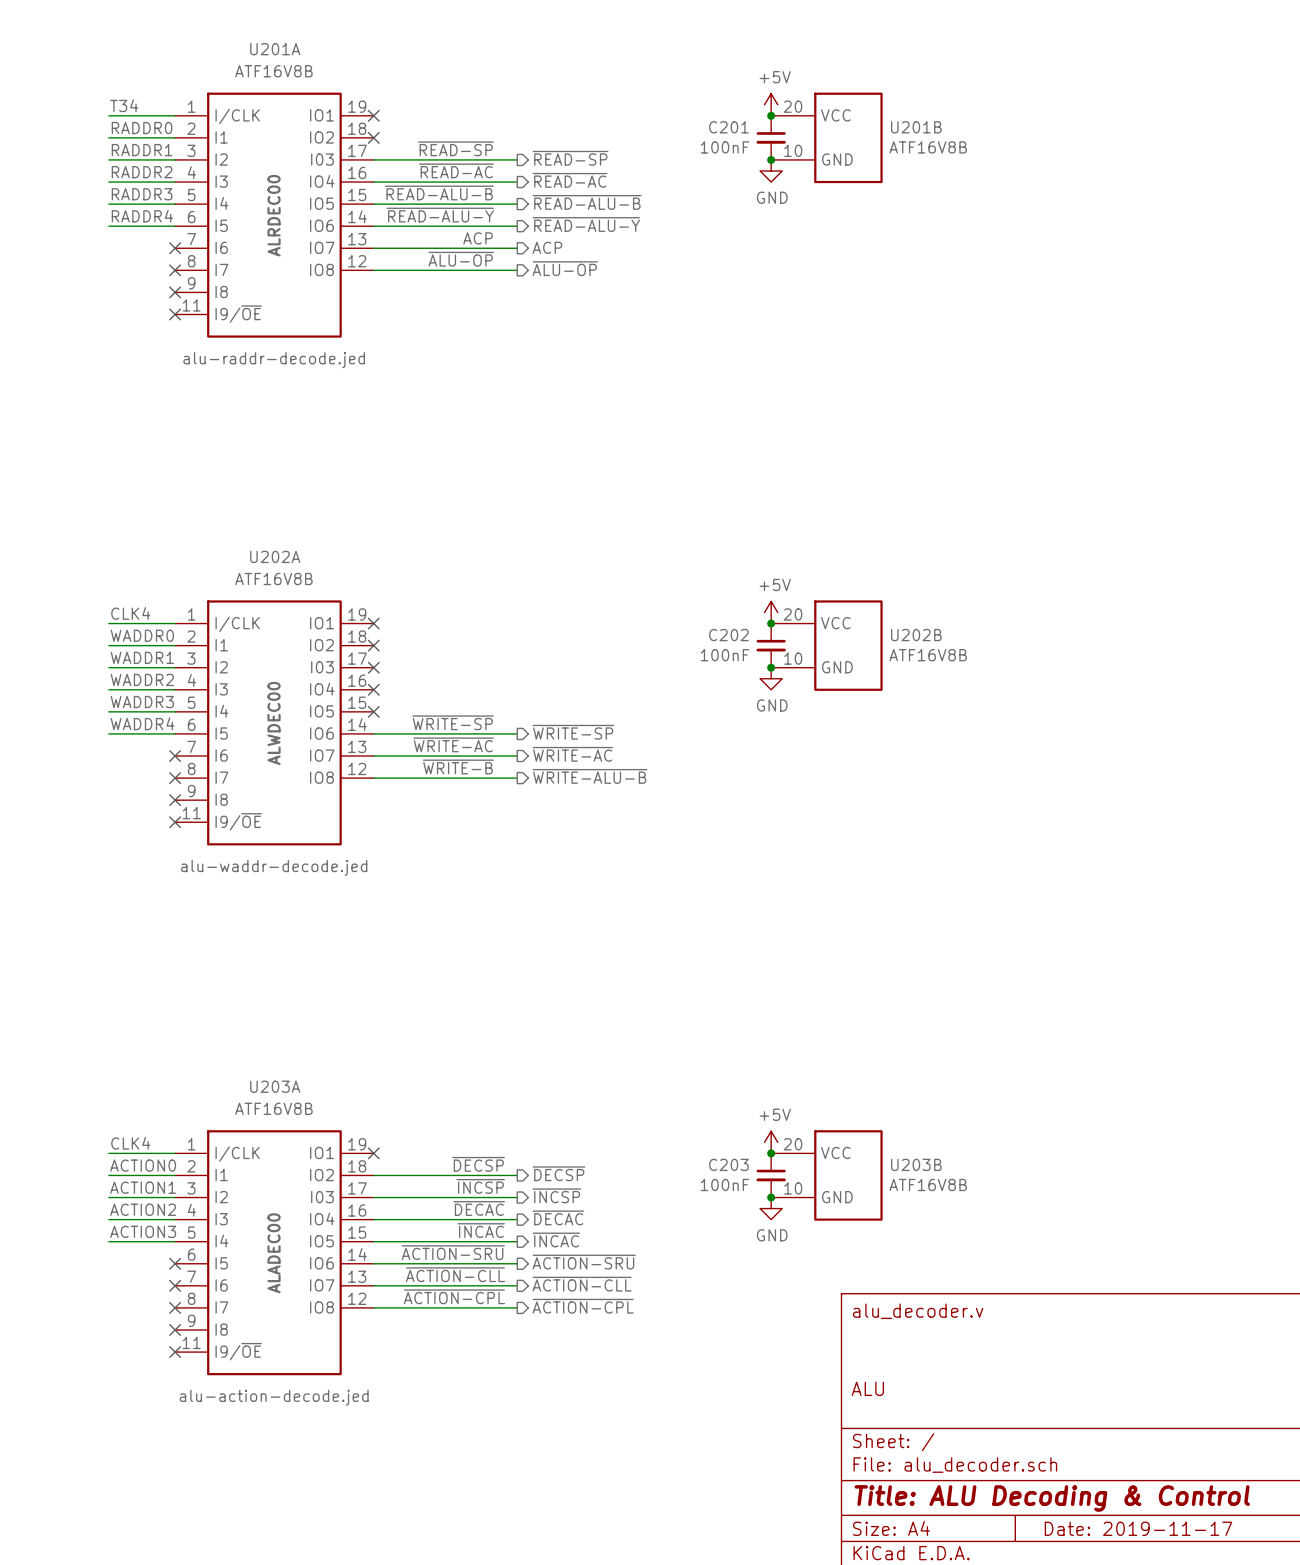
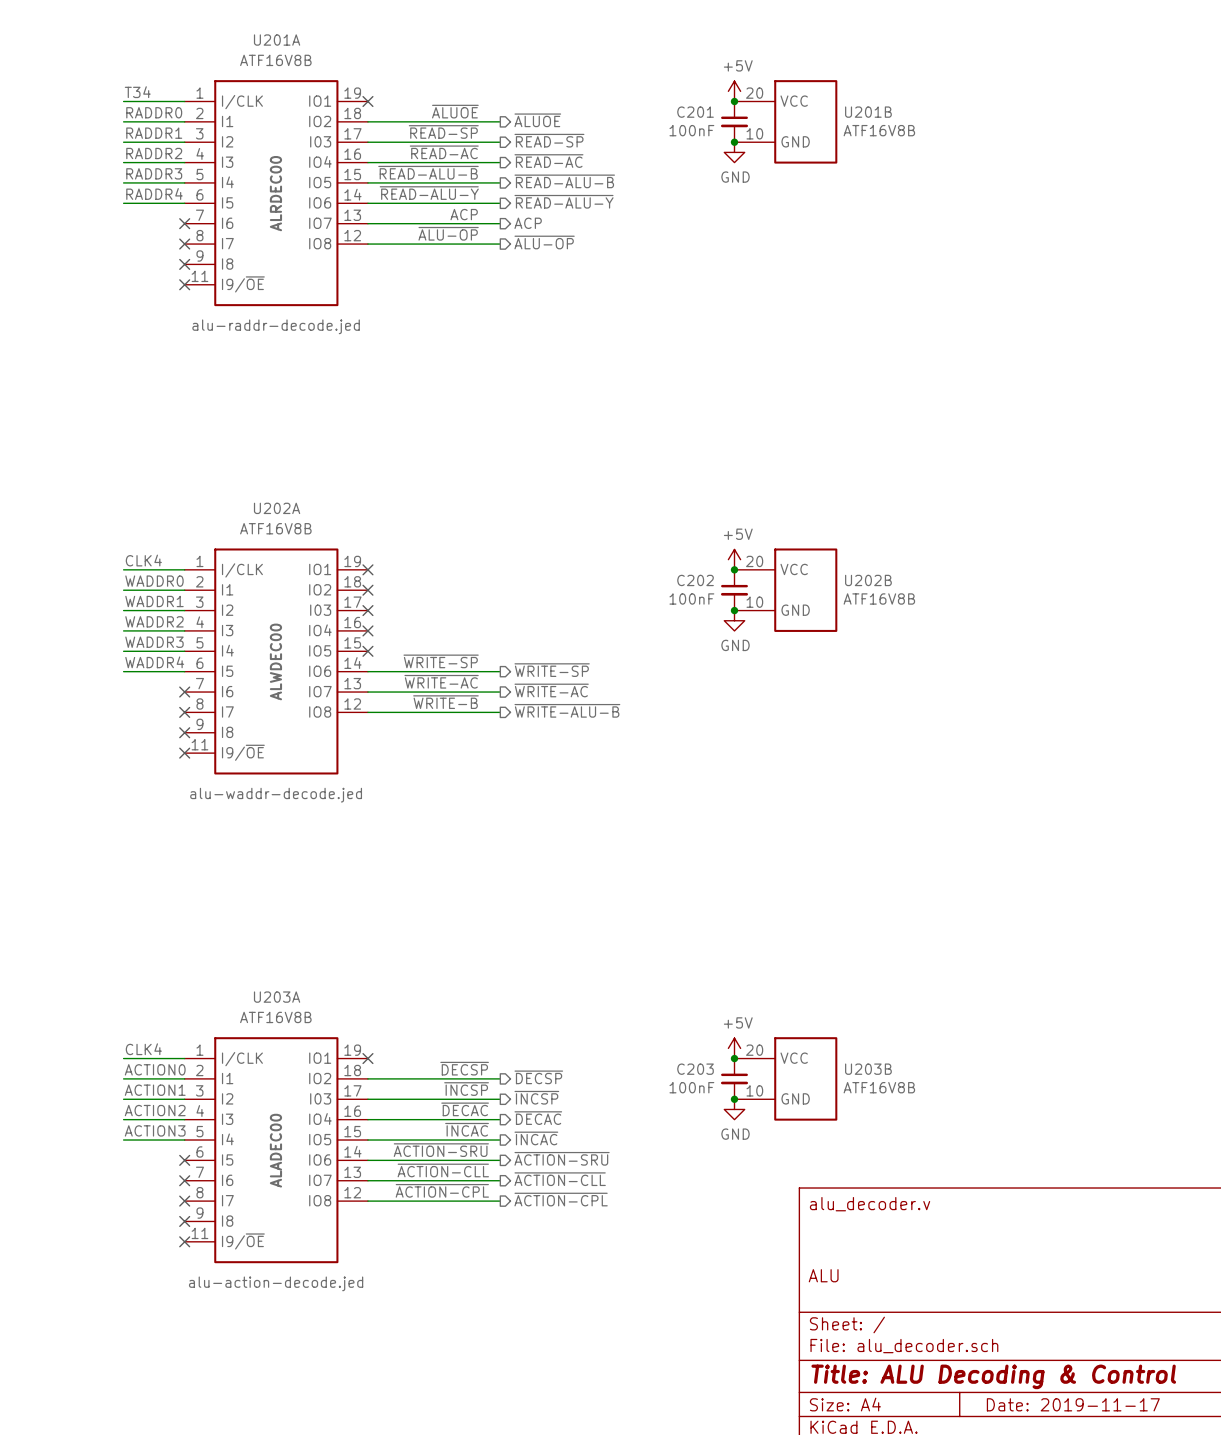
label: none -> ~{ALUOE} (455, 111)
hierarchical label: none -> ~{ALUOE} (537, 120)
wire: none -> (367, 121) (500, 121)
no-connect mark: (373, 137) -> none

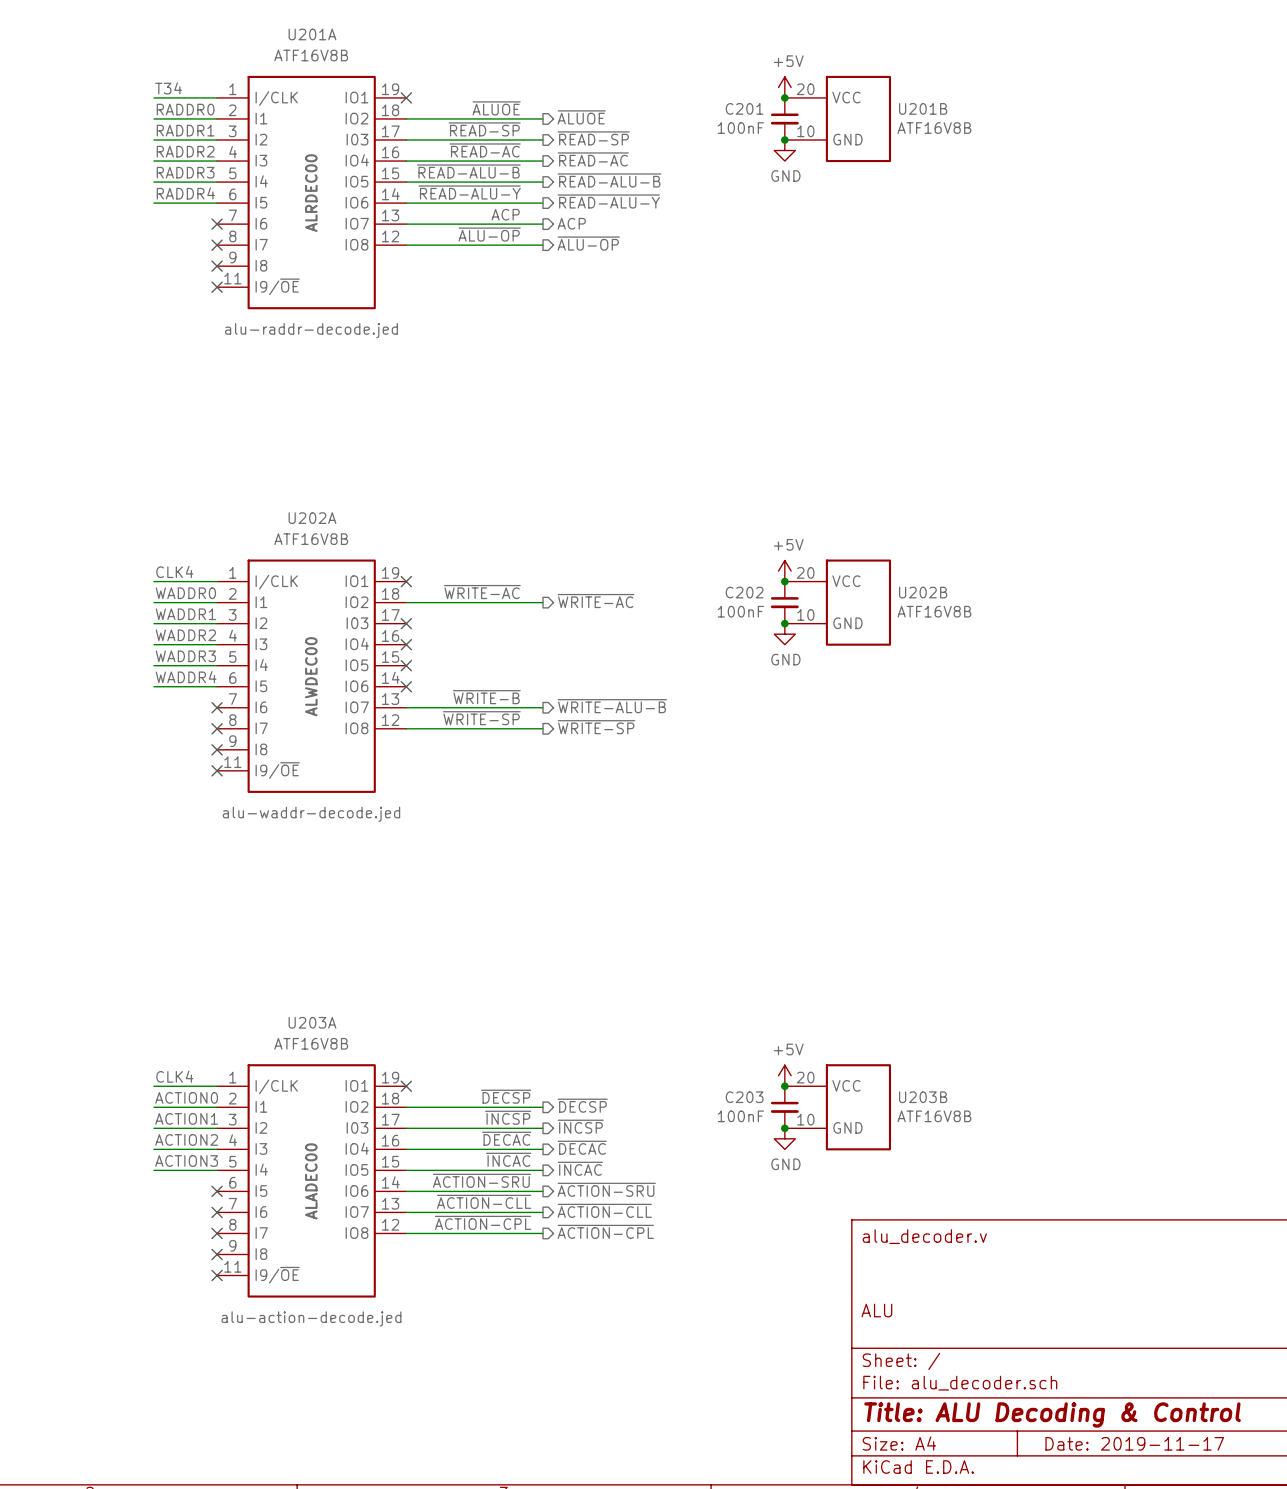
label: none -> ~{WRITE-AC} (482, 592)
hierarchical label: none -> ~{WRITE-AC} (596, 601)
no-connect mark: (367, 590) -> none
label: ~{WRITE-SP} (441, 661) -> none
hierarchical label: ~{WRITE-SP} (552, 670) -> none
wire: (367, 671) (500, 671) -> (406, 602) (543, 602)
no-connect mark: none -> (406, 686)
label: ~{WRITE-AC} (441, 681) -> ~{WRITE-B} (486, 697)
hierarchical label: ~{WRITE-AC} (551, 690) -> ~{WRITE-ALU-B} (612, 706)
label: ~{WRITE-B} (445, 702) -> ~{WRITE-SP} (481, 718)
hierarchical label: ~{WRITE-ALU-B} (567, 710) -> ~{WRITE-SP} (596, 727)

